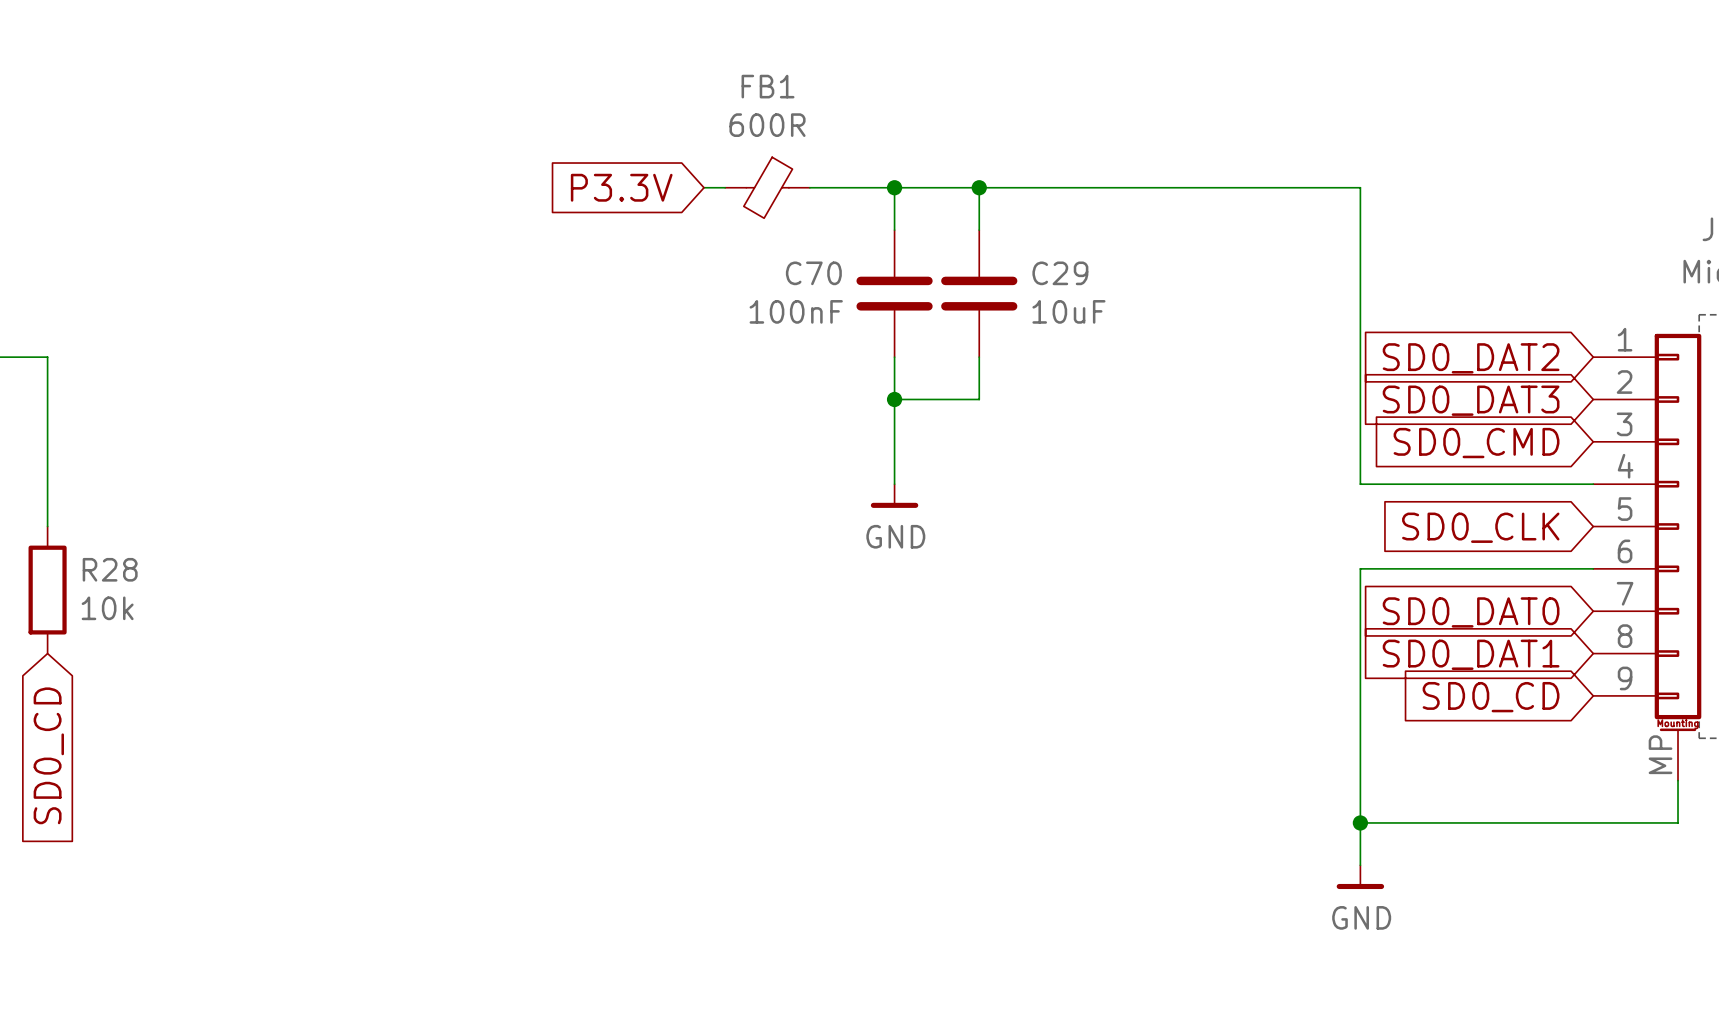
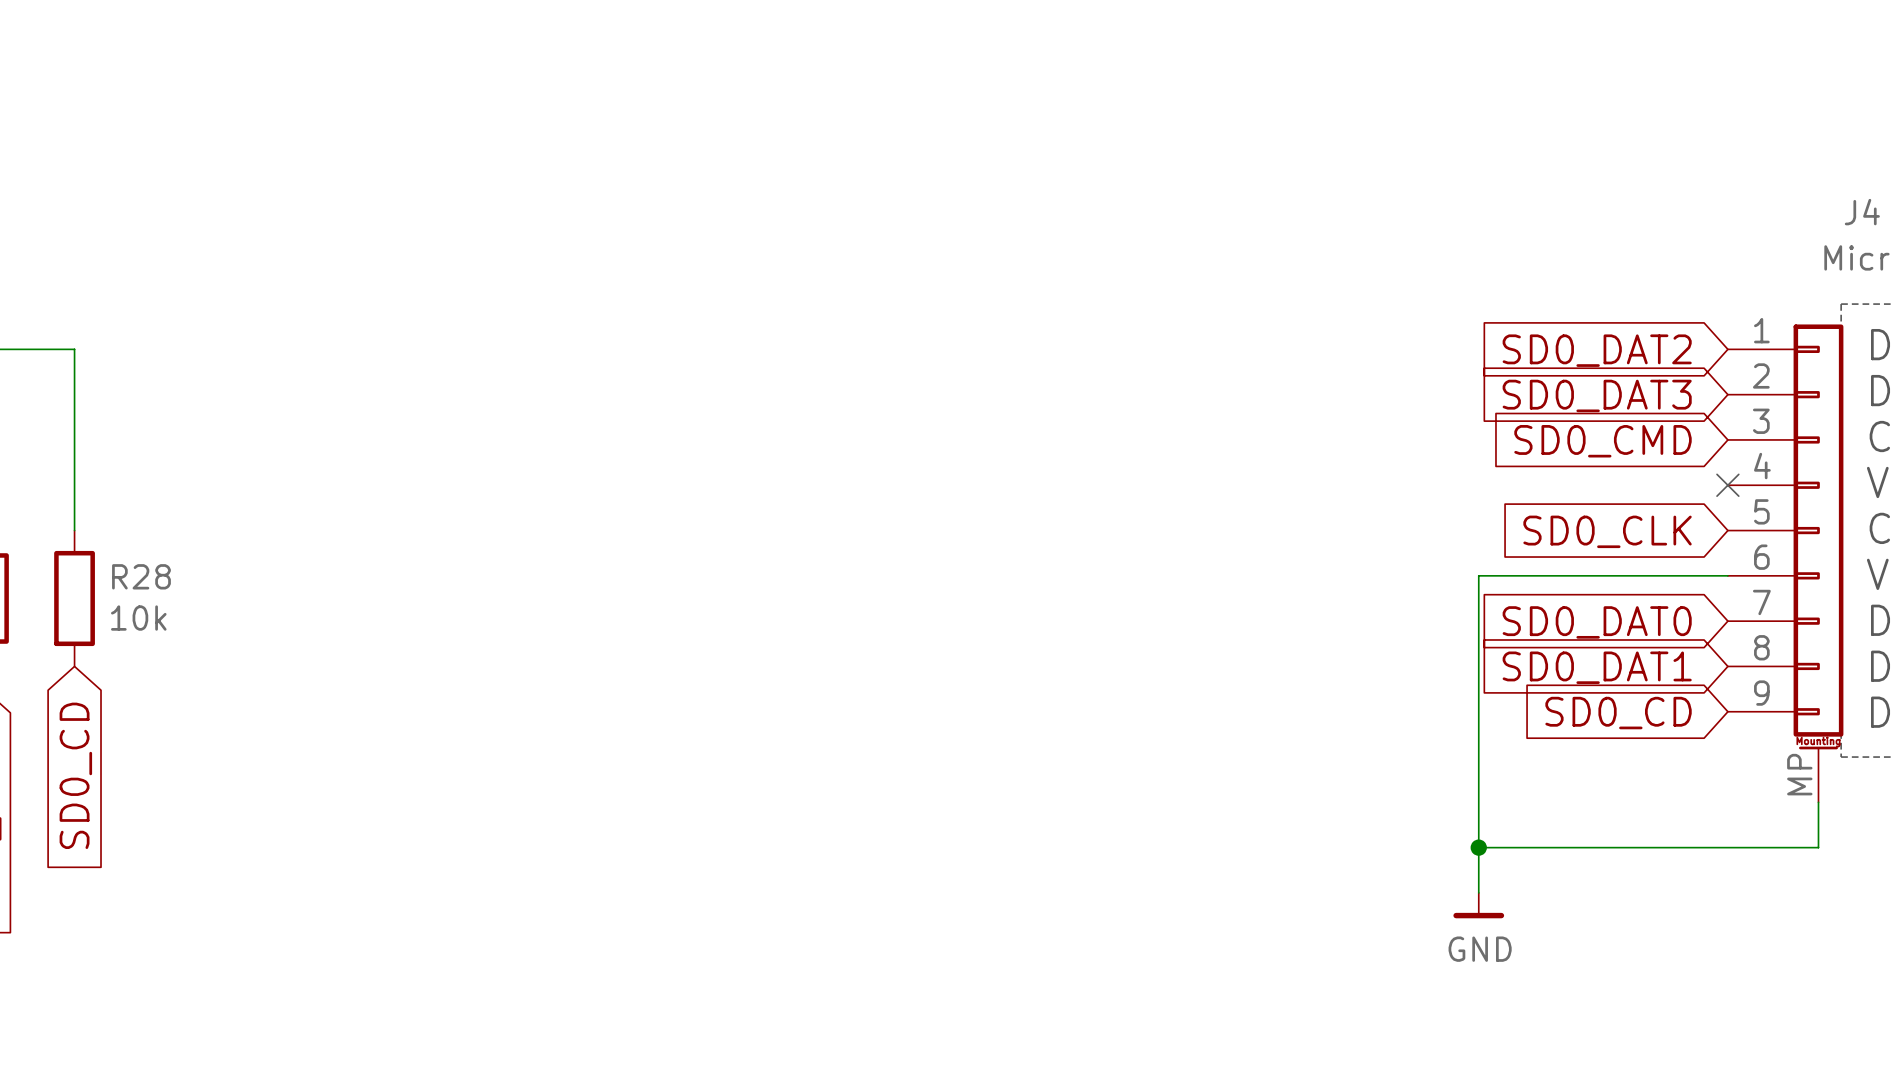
global label: P3.3V (621, 187) -> none
wire: (703, 187) (725, 187) -> none
FB1: 600R (767, 187) -> none
wire: (809, 187) (1360, 187) (1360, 484) (1593, 484) -> none
wire: (894, 187) (894, 230) -> none
junction: (894, 187) -> none
wire: (979, 187) (979, 230) -> none
junction: (979, 187) -> none
C70: 100nF (894, 293) -> none
C29: 10uF (979, 293) -> none
wire: (894, 357) (894, 484) -> none
wire: (979, 357) (979, 399) (894, 399) -> none
junction: (894, 399) -> none
no-connect mark: none -> (1727, 485)
power symbol: GND (894, 496) -> none

